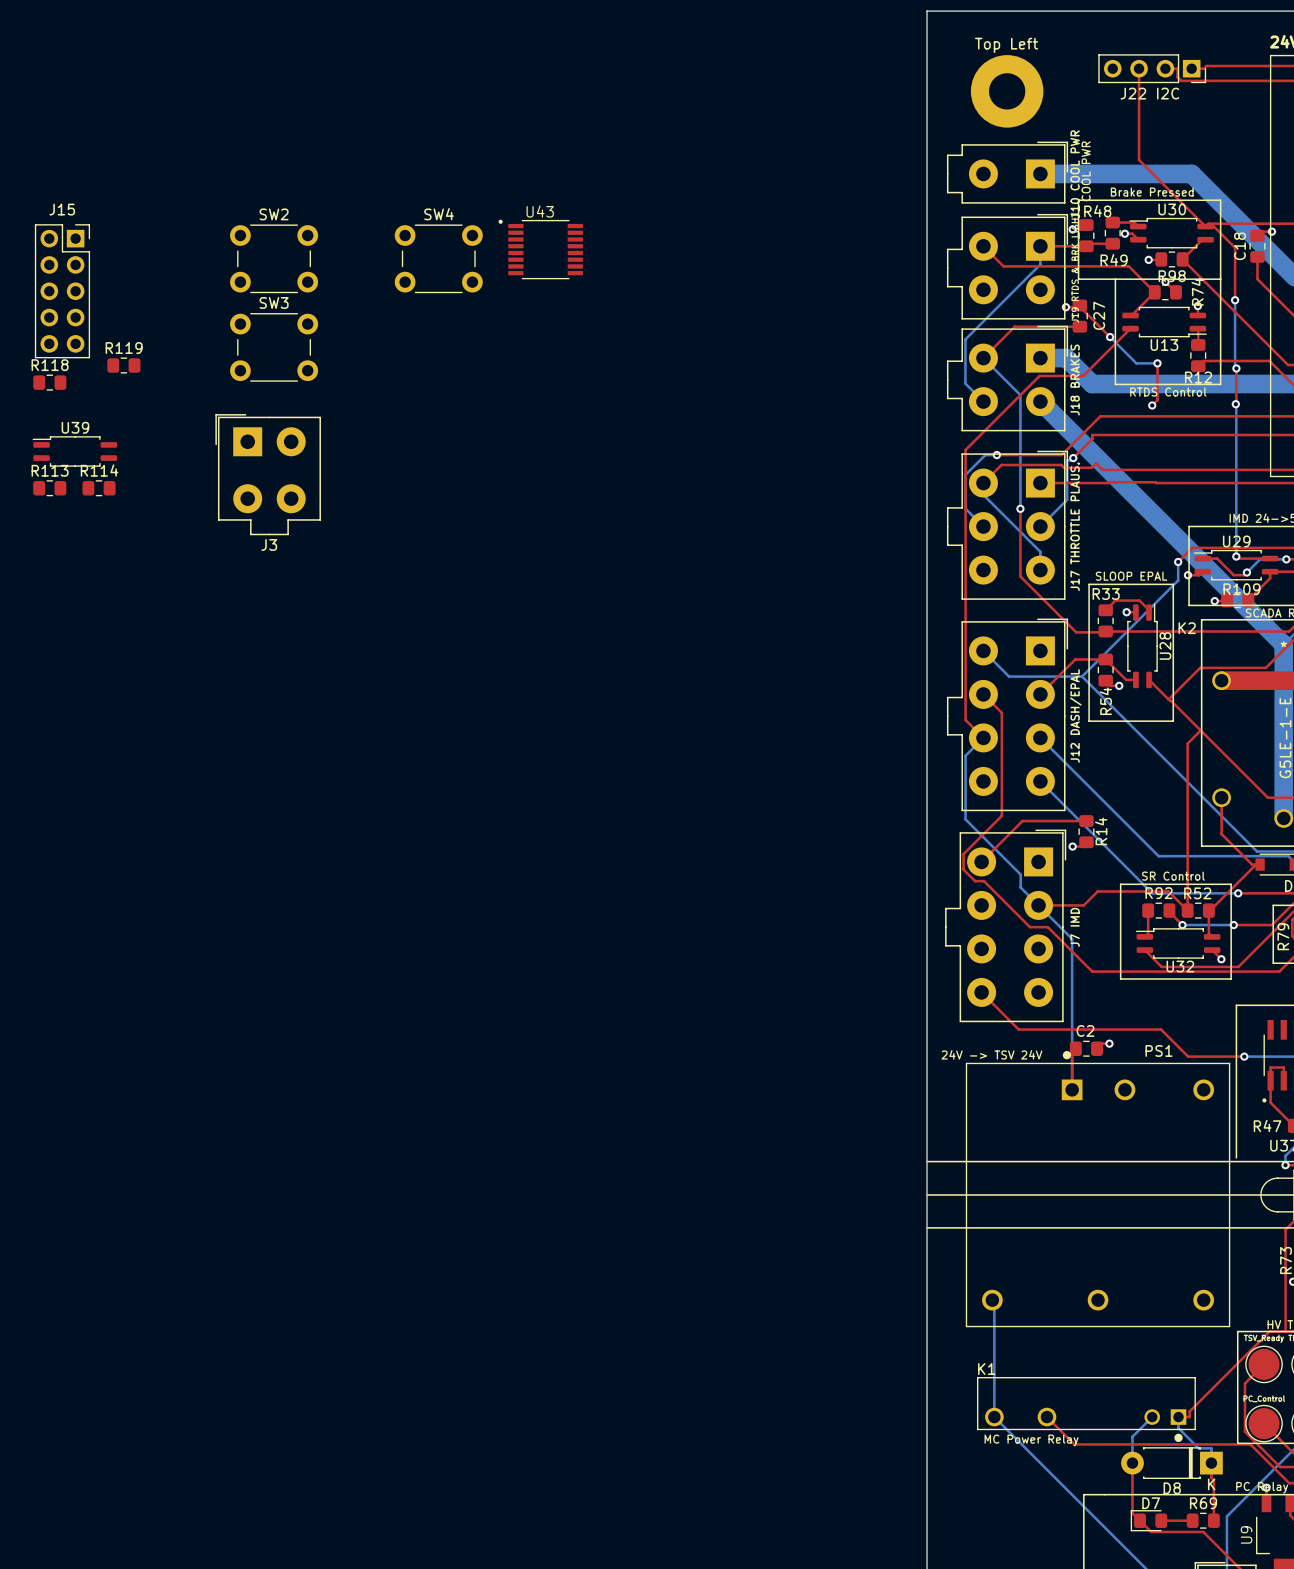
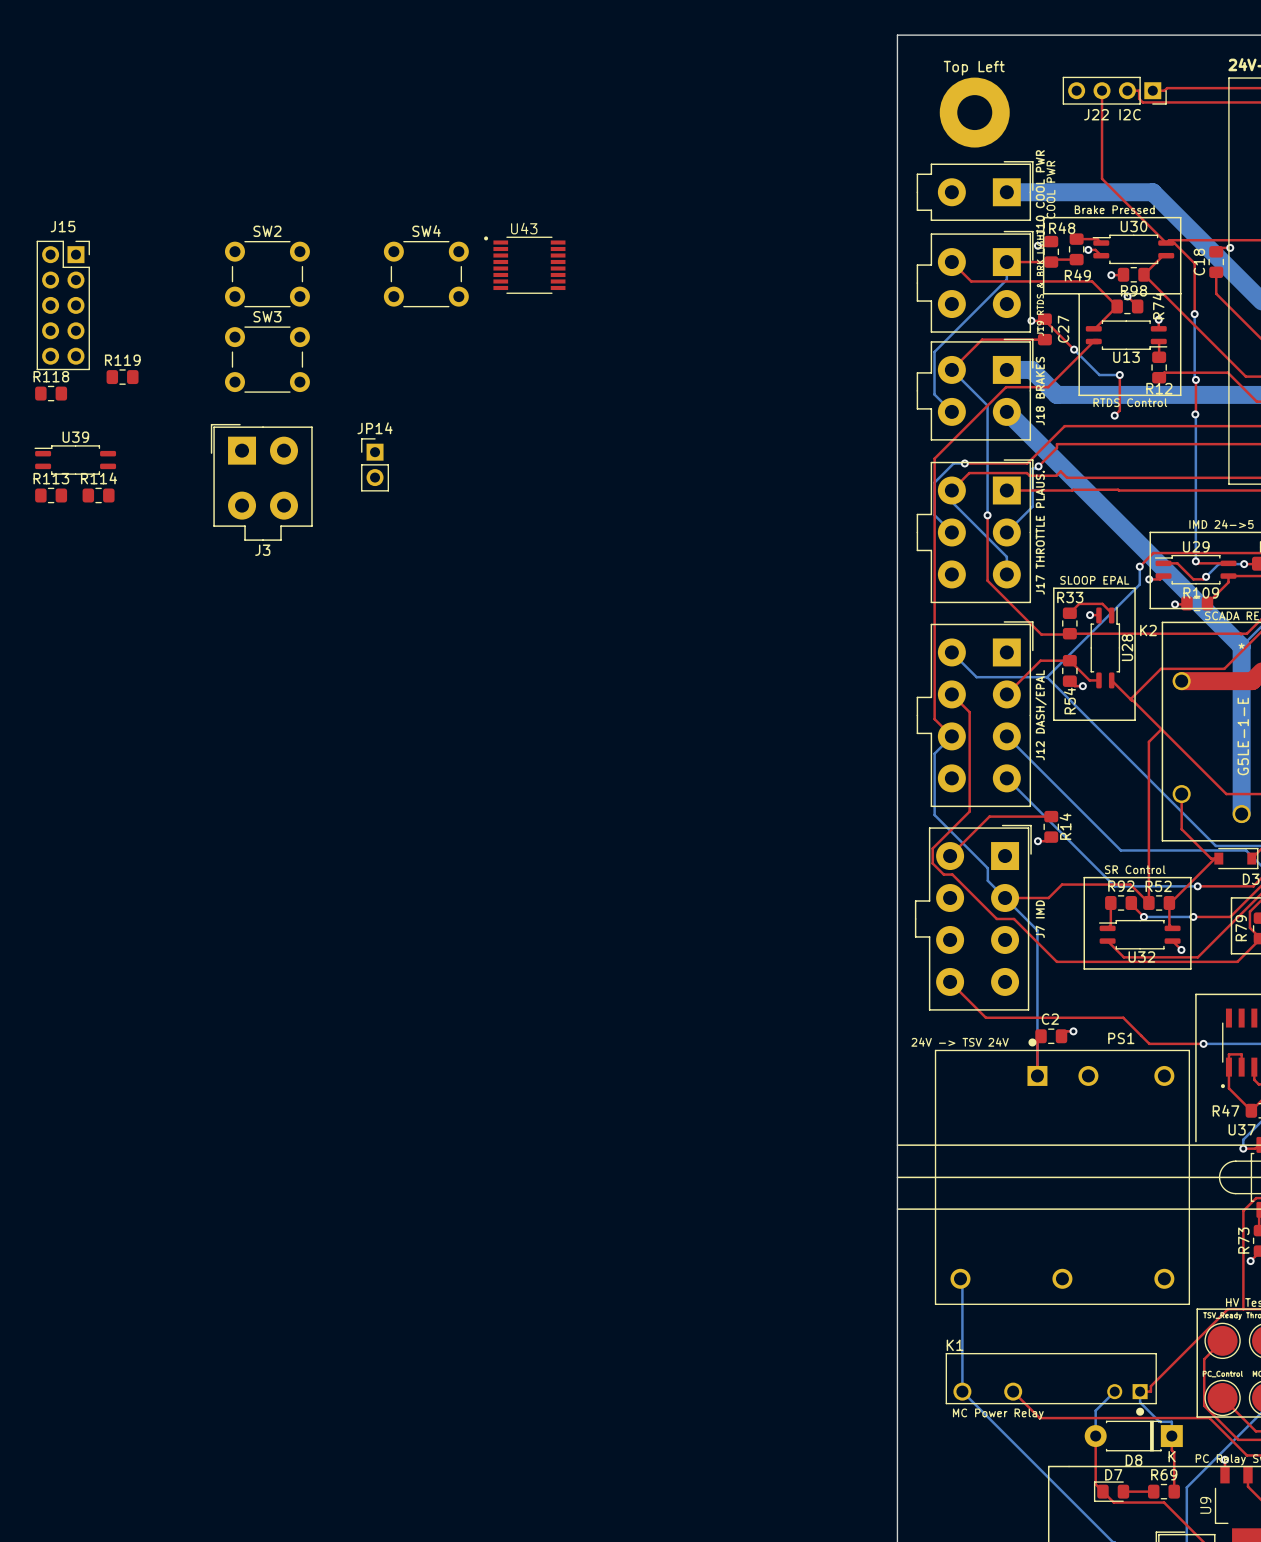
JP14: none -> (375, 464)

